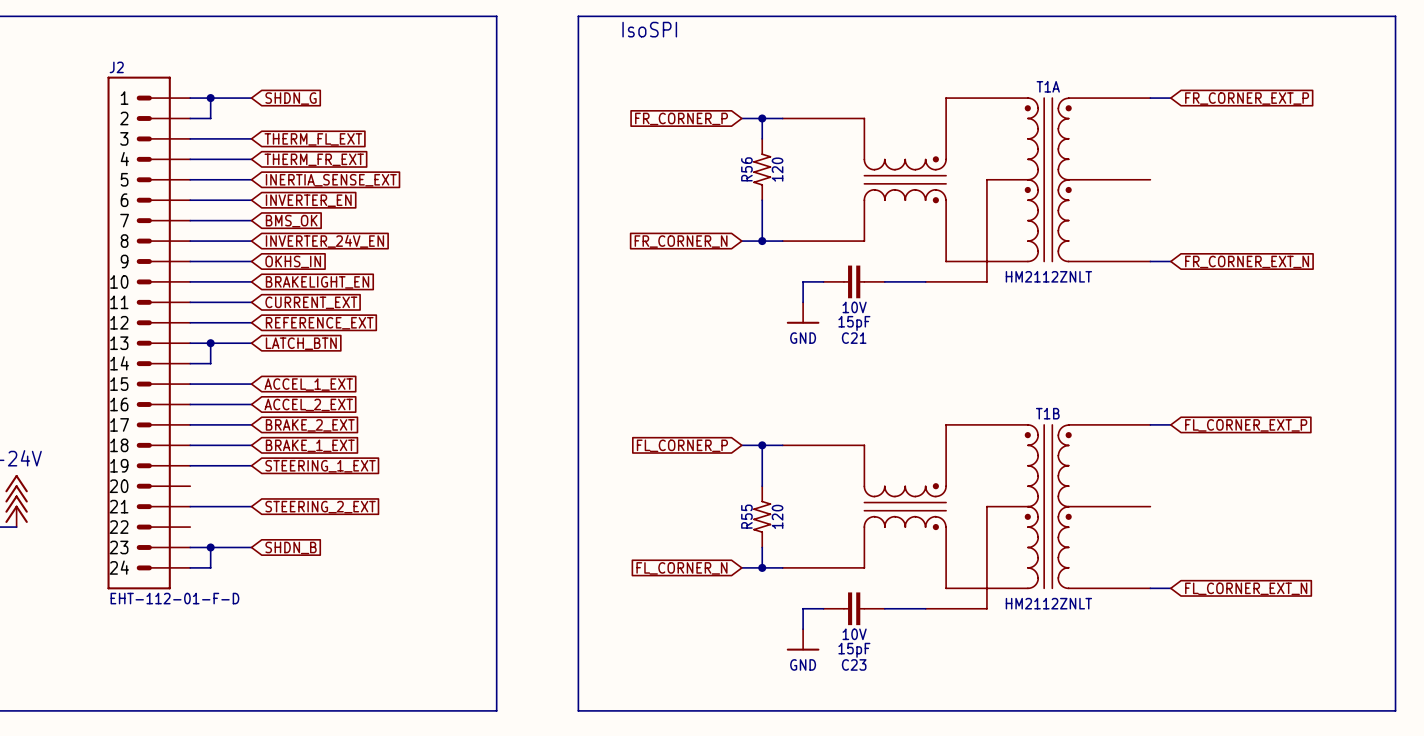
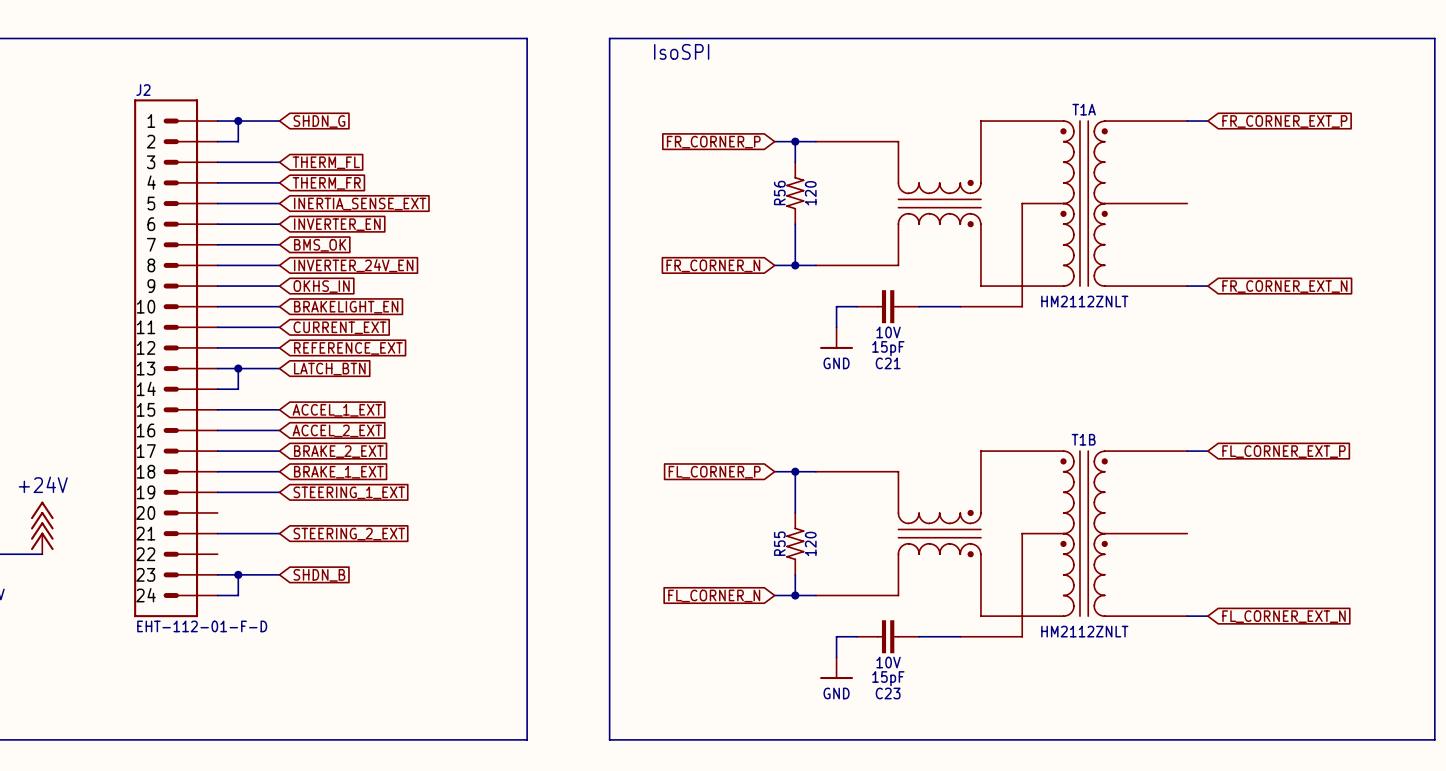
global label: THERM_FL_EXT (313, 139) -> THERM_FL (326, 162)
global label: THERM_FR_EXT (314, 159) -> THERM_FR (326, 183)

